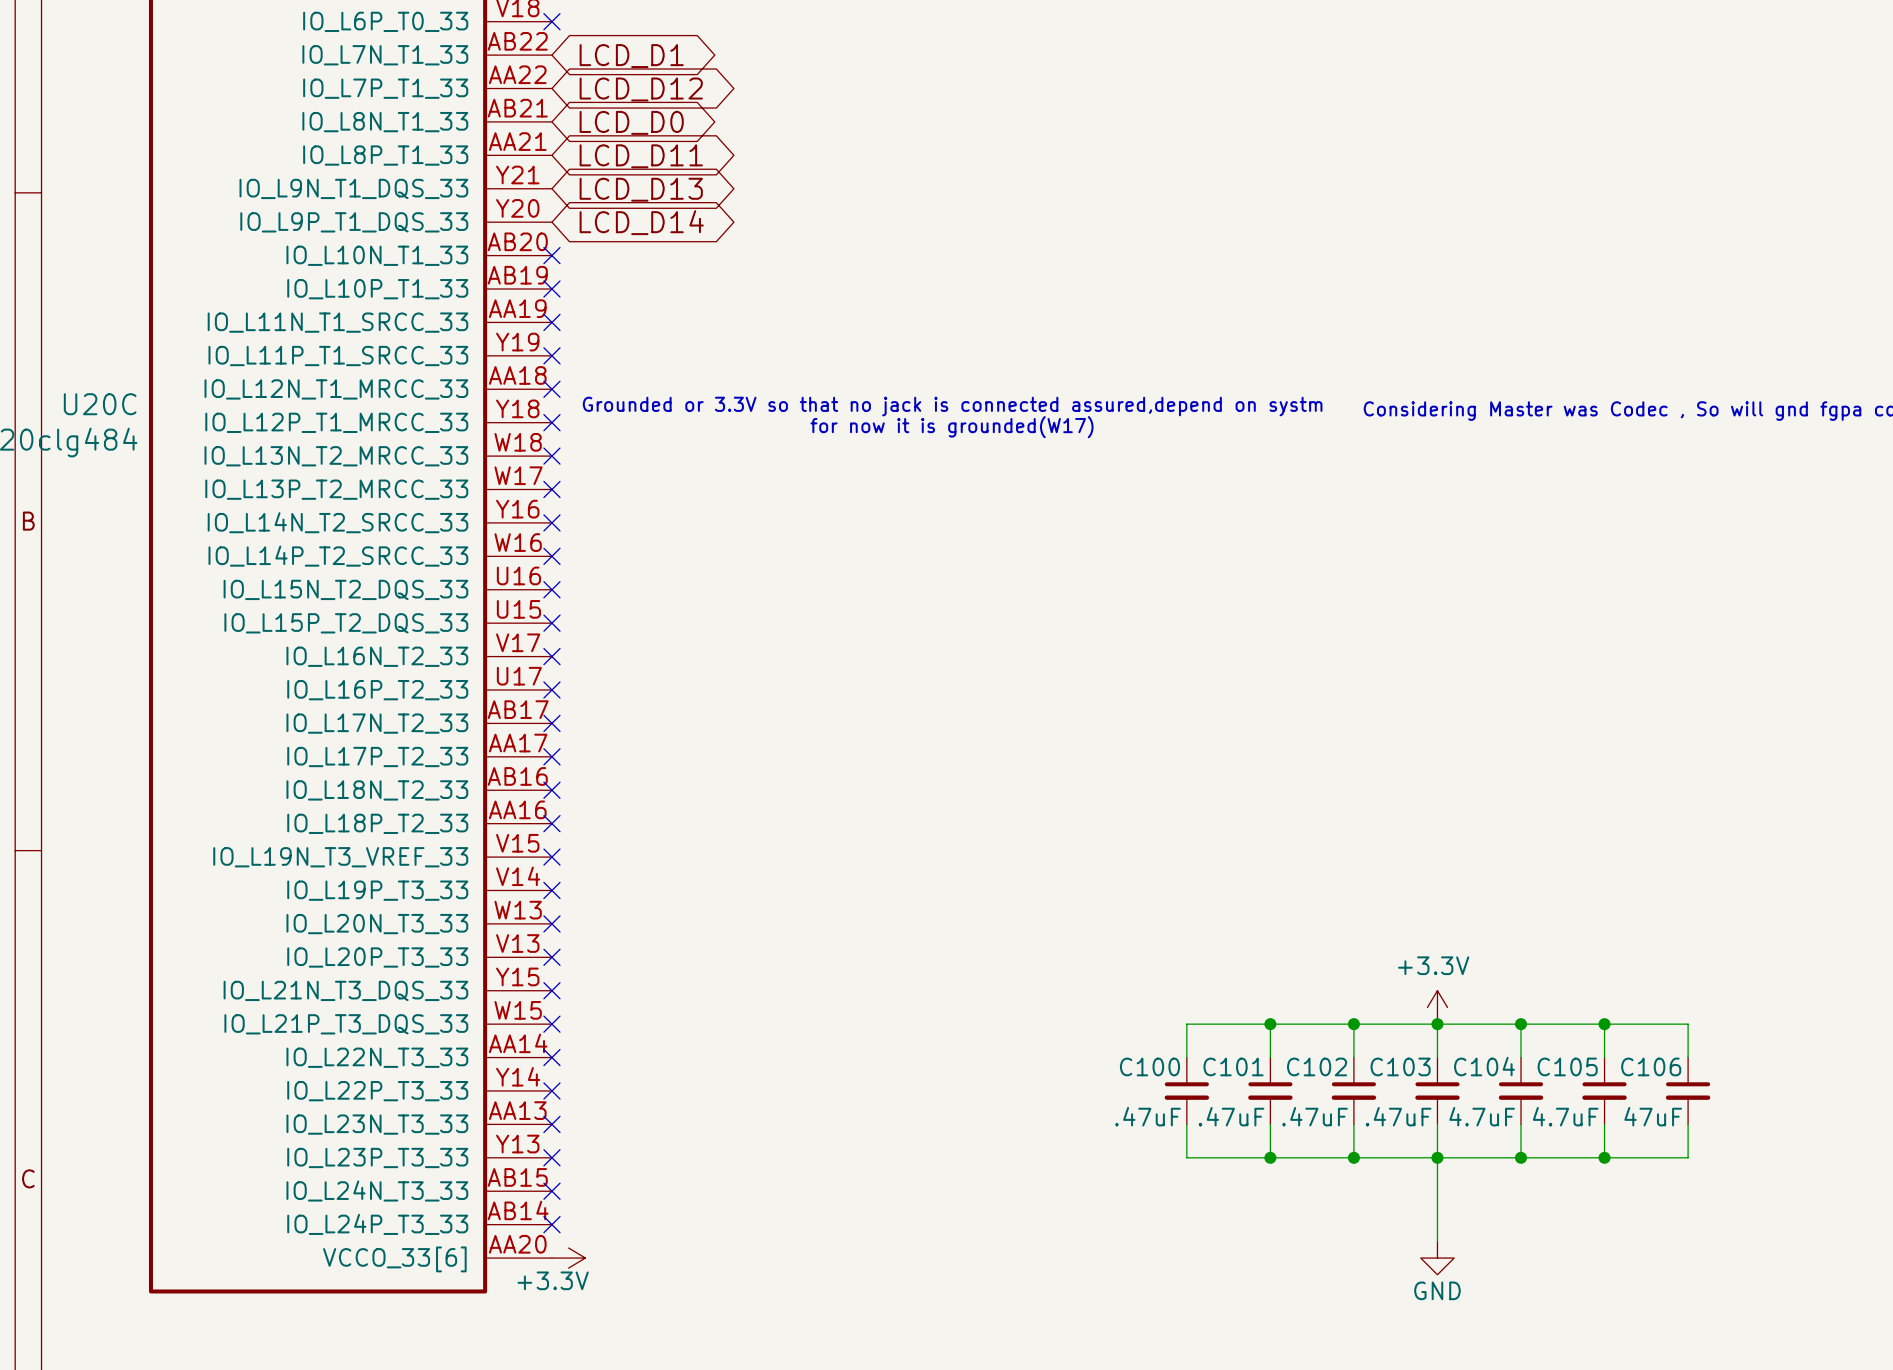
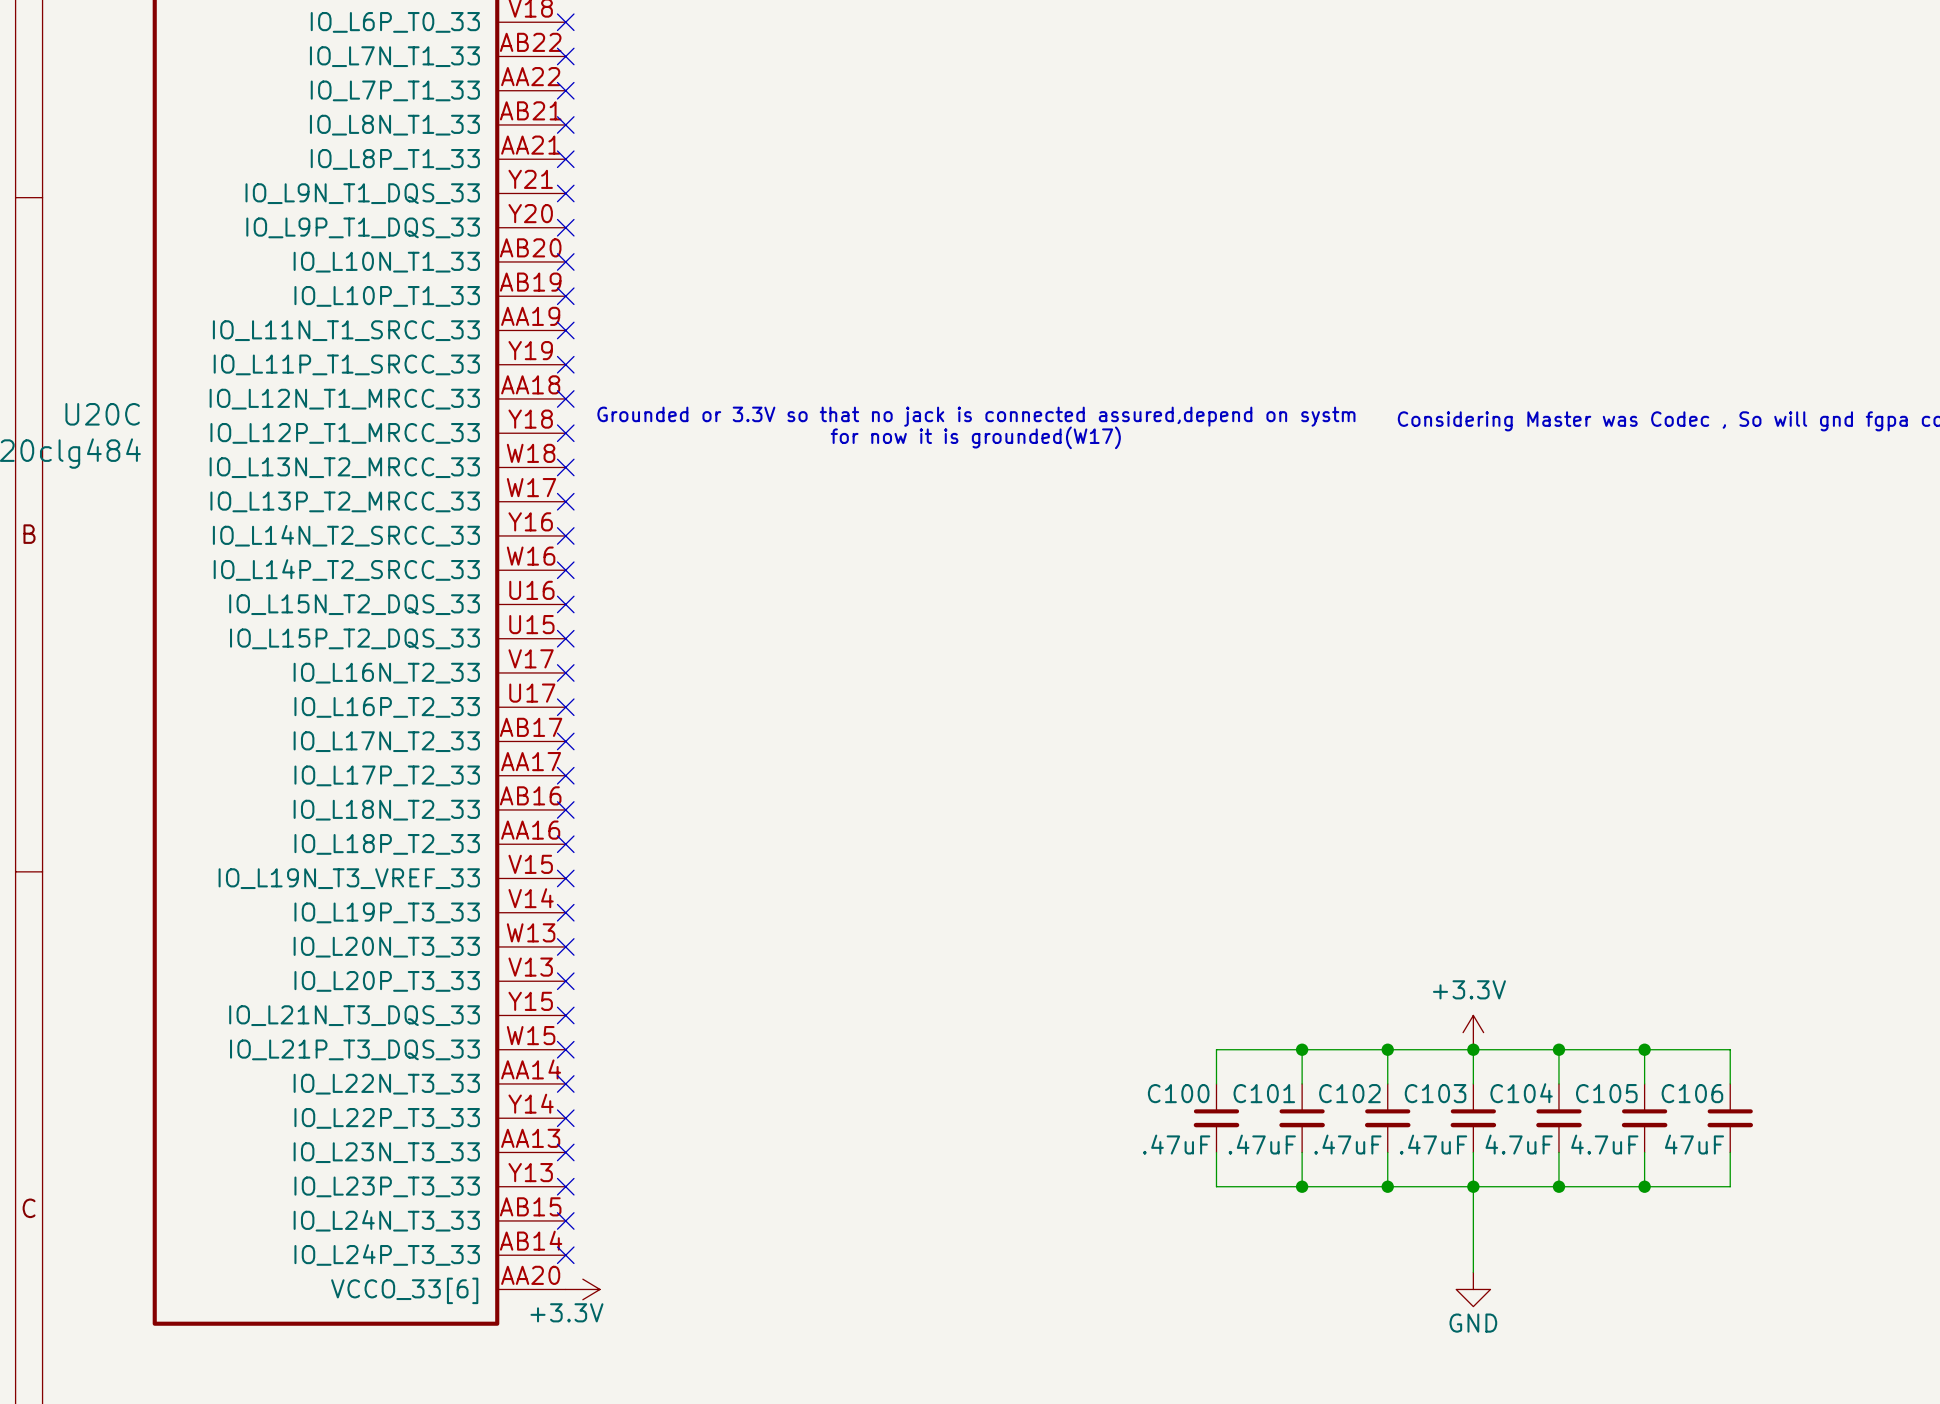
no-connect mark: none -> (565, 56)
global label: LCD_D1 (631, 56) -> none
no-connect mark: none -> (565, 90)
global label: LCD_D12 (641, 89) -> none
no-connect mark: none -> (565, 124)
global label: LCD_D0 (631, 122) -> none
no-connect mark: none -> (565, 159)
global label: LCD_D11 (641, 156) -> none
no-connect mark: none -> (565, 193)
global label: LCD_D13 (641, 189) -> none
no-connect mark: none -> (565, 227)
global label: LCD_D14 (641, 222) -> none

